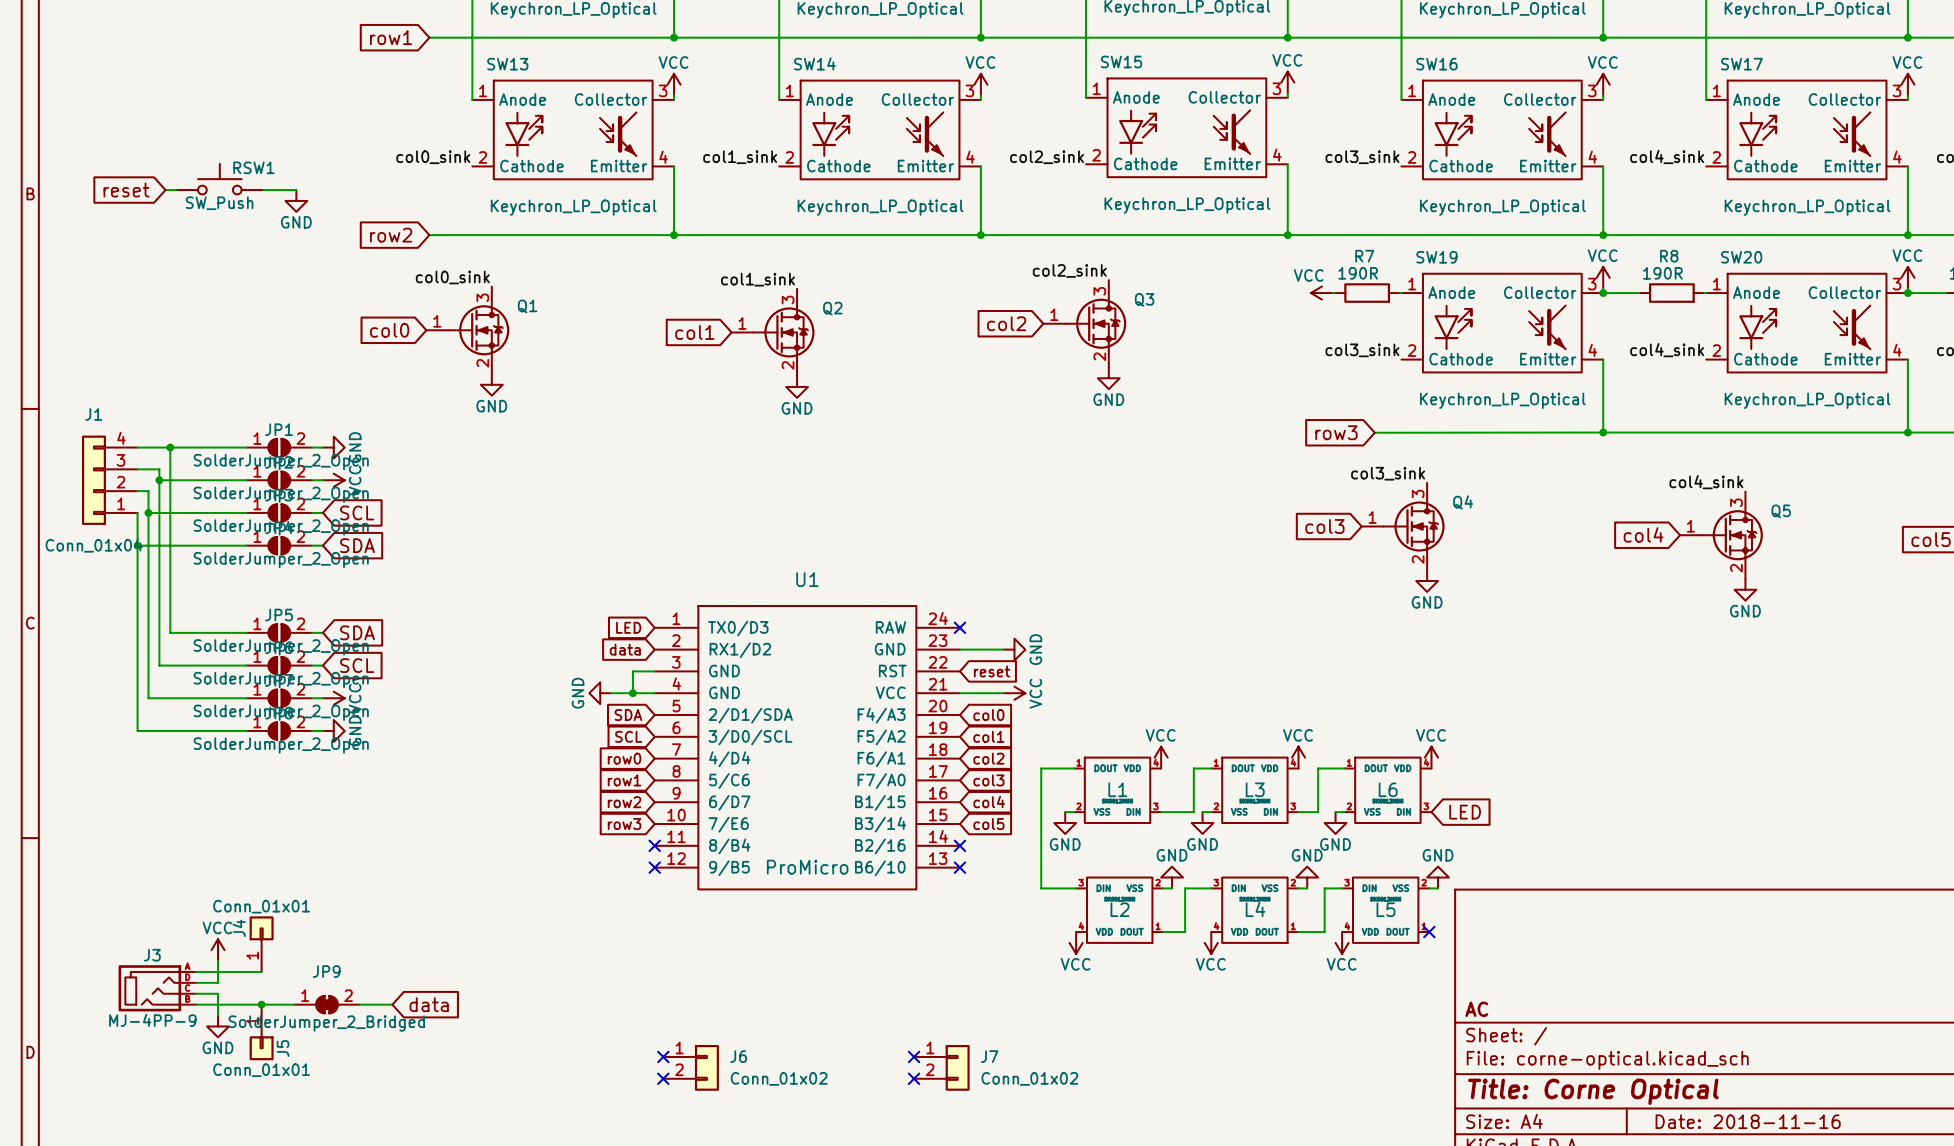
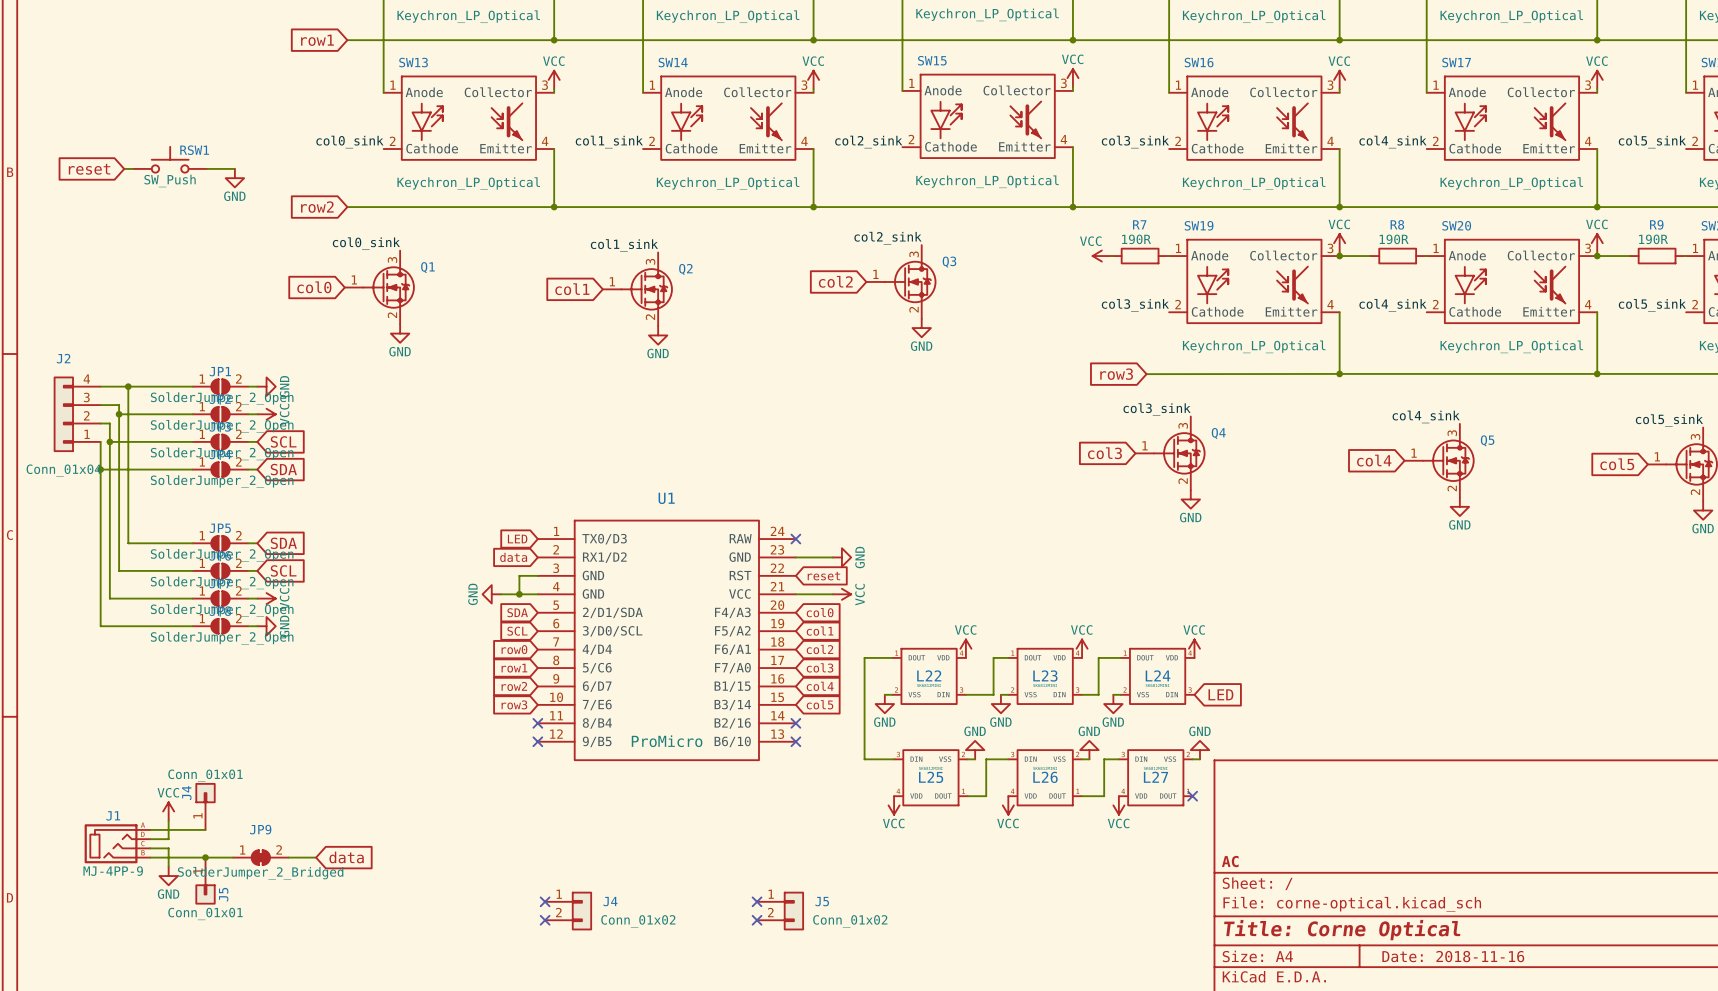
J1 name: J1 (93, 414) -> J2 (63, 358)
L1 name: L1 (1117, 789) -> L22 (929, 675)
L3 name: L3 (1255, 789) -> L23 (1045, 675)
L6 name: L6 (1388, 789) -> L24 (1158, 675)
L2 name: L2 (1120, 909) -> L25 (931, 777)
L4 name: L4 (1255, 909) -> L26 (1045, 777)
L5 name: L5 (1386, 909) -> L27 (1155, 777)
J3 name: J3 (152, 955) -> J1 (113, 815)
J6 name: J6 (738, 1056) -> J4 (610, 901)
J7 name: J7 (989, 1056) -> J5 (822, 901)

